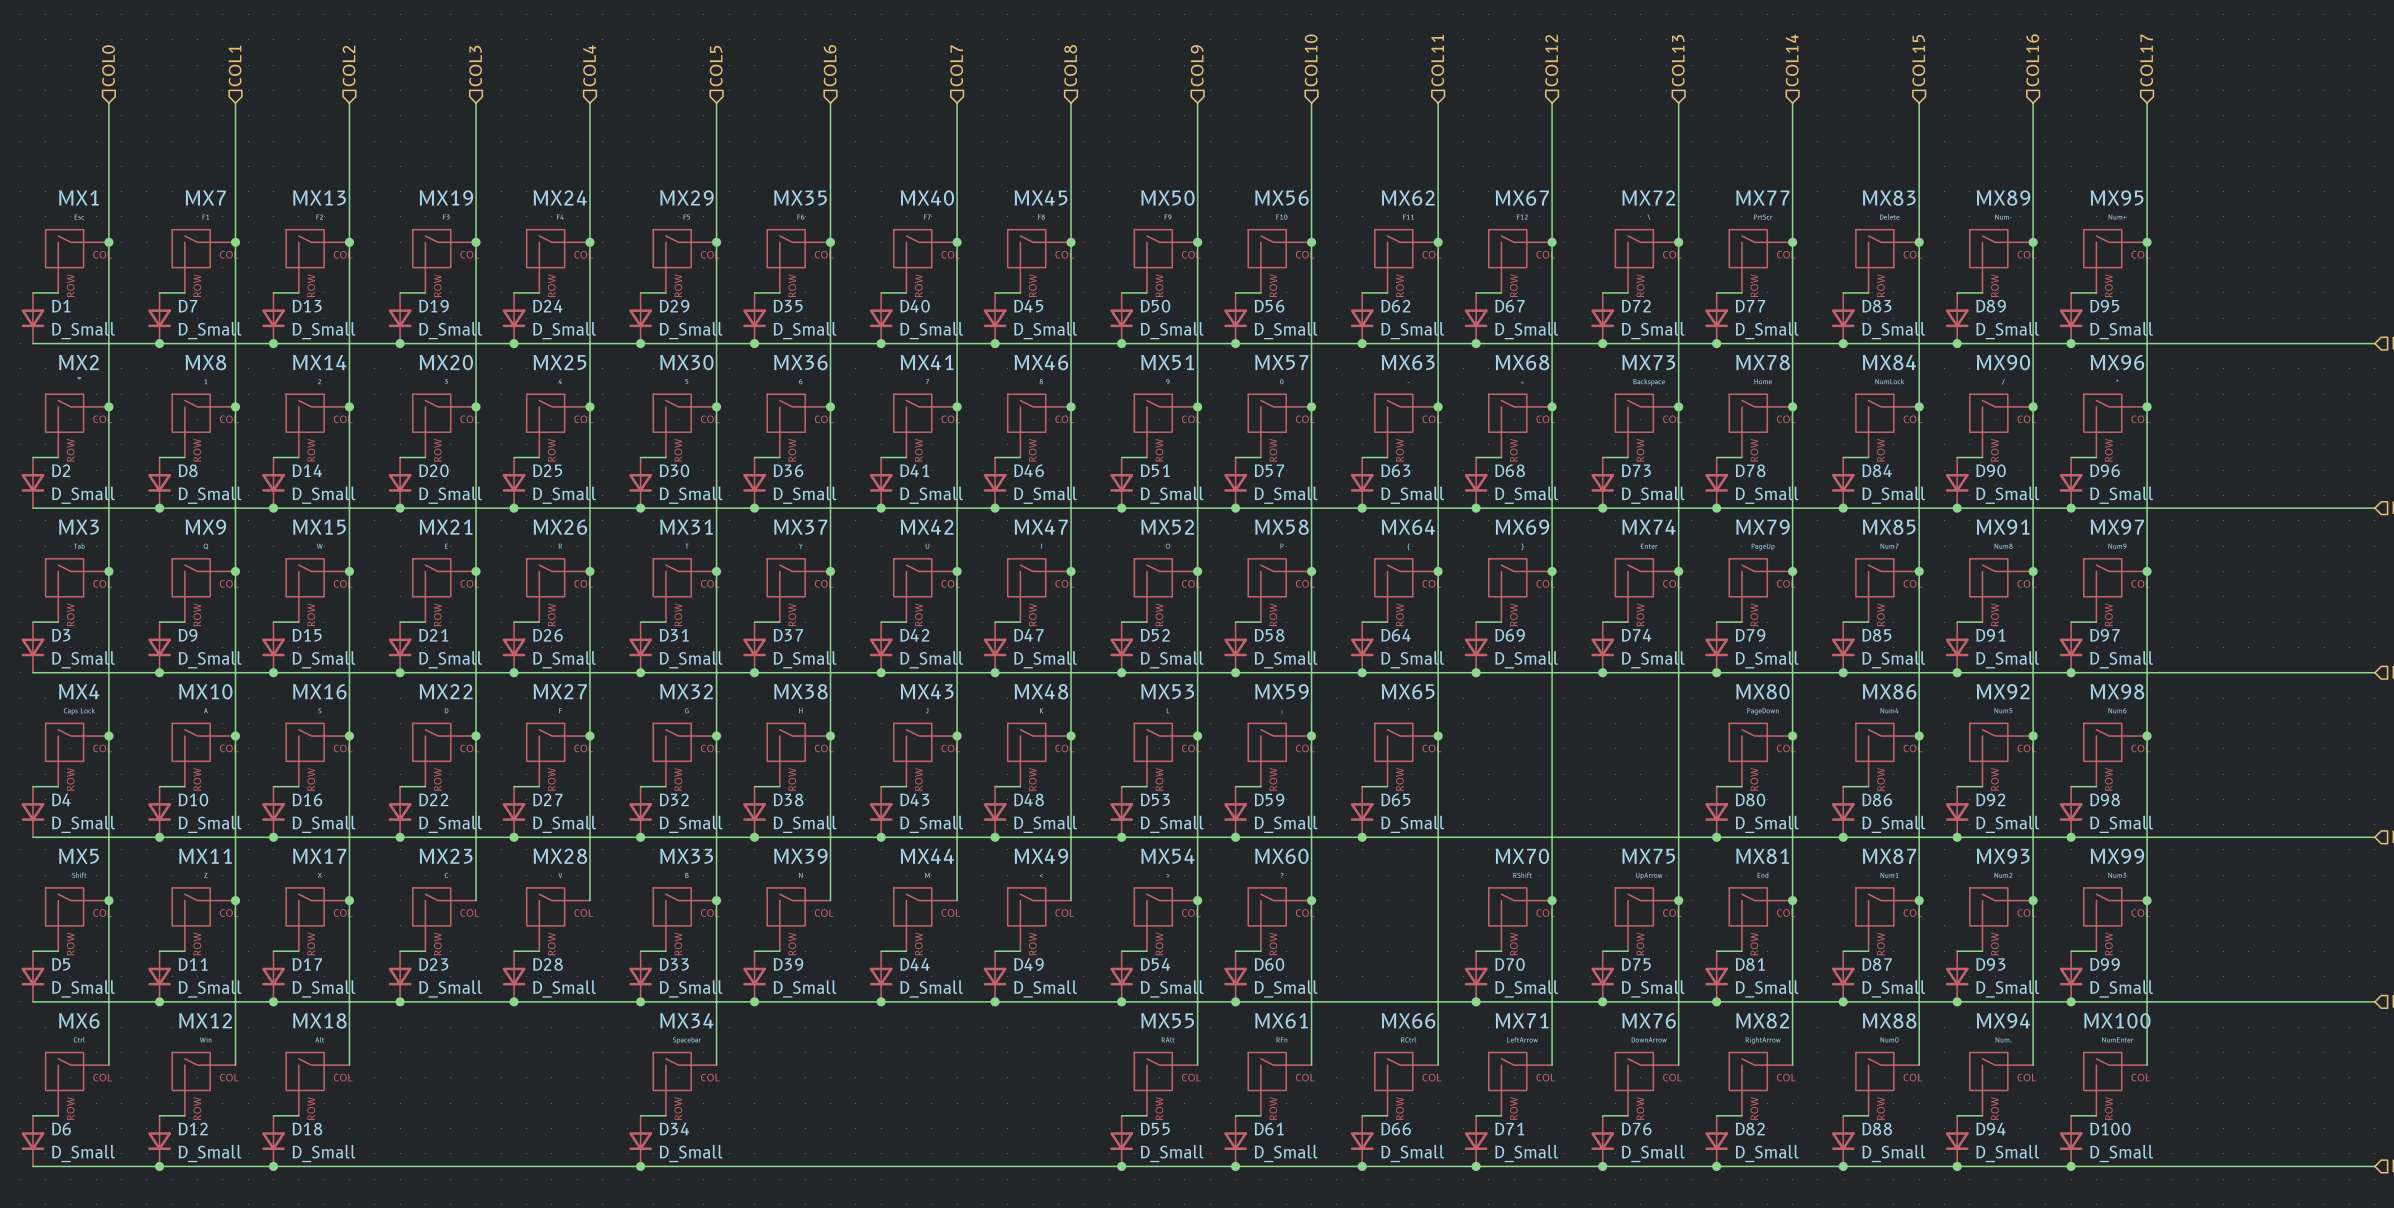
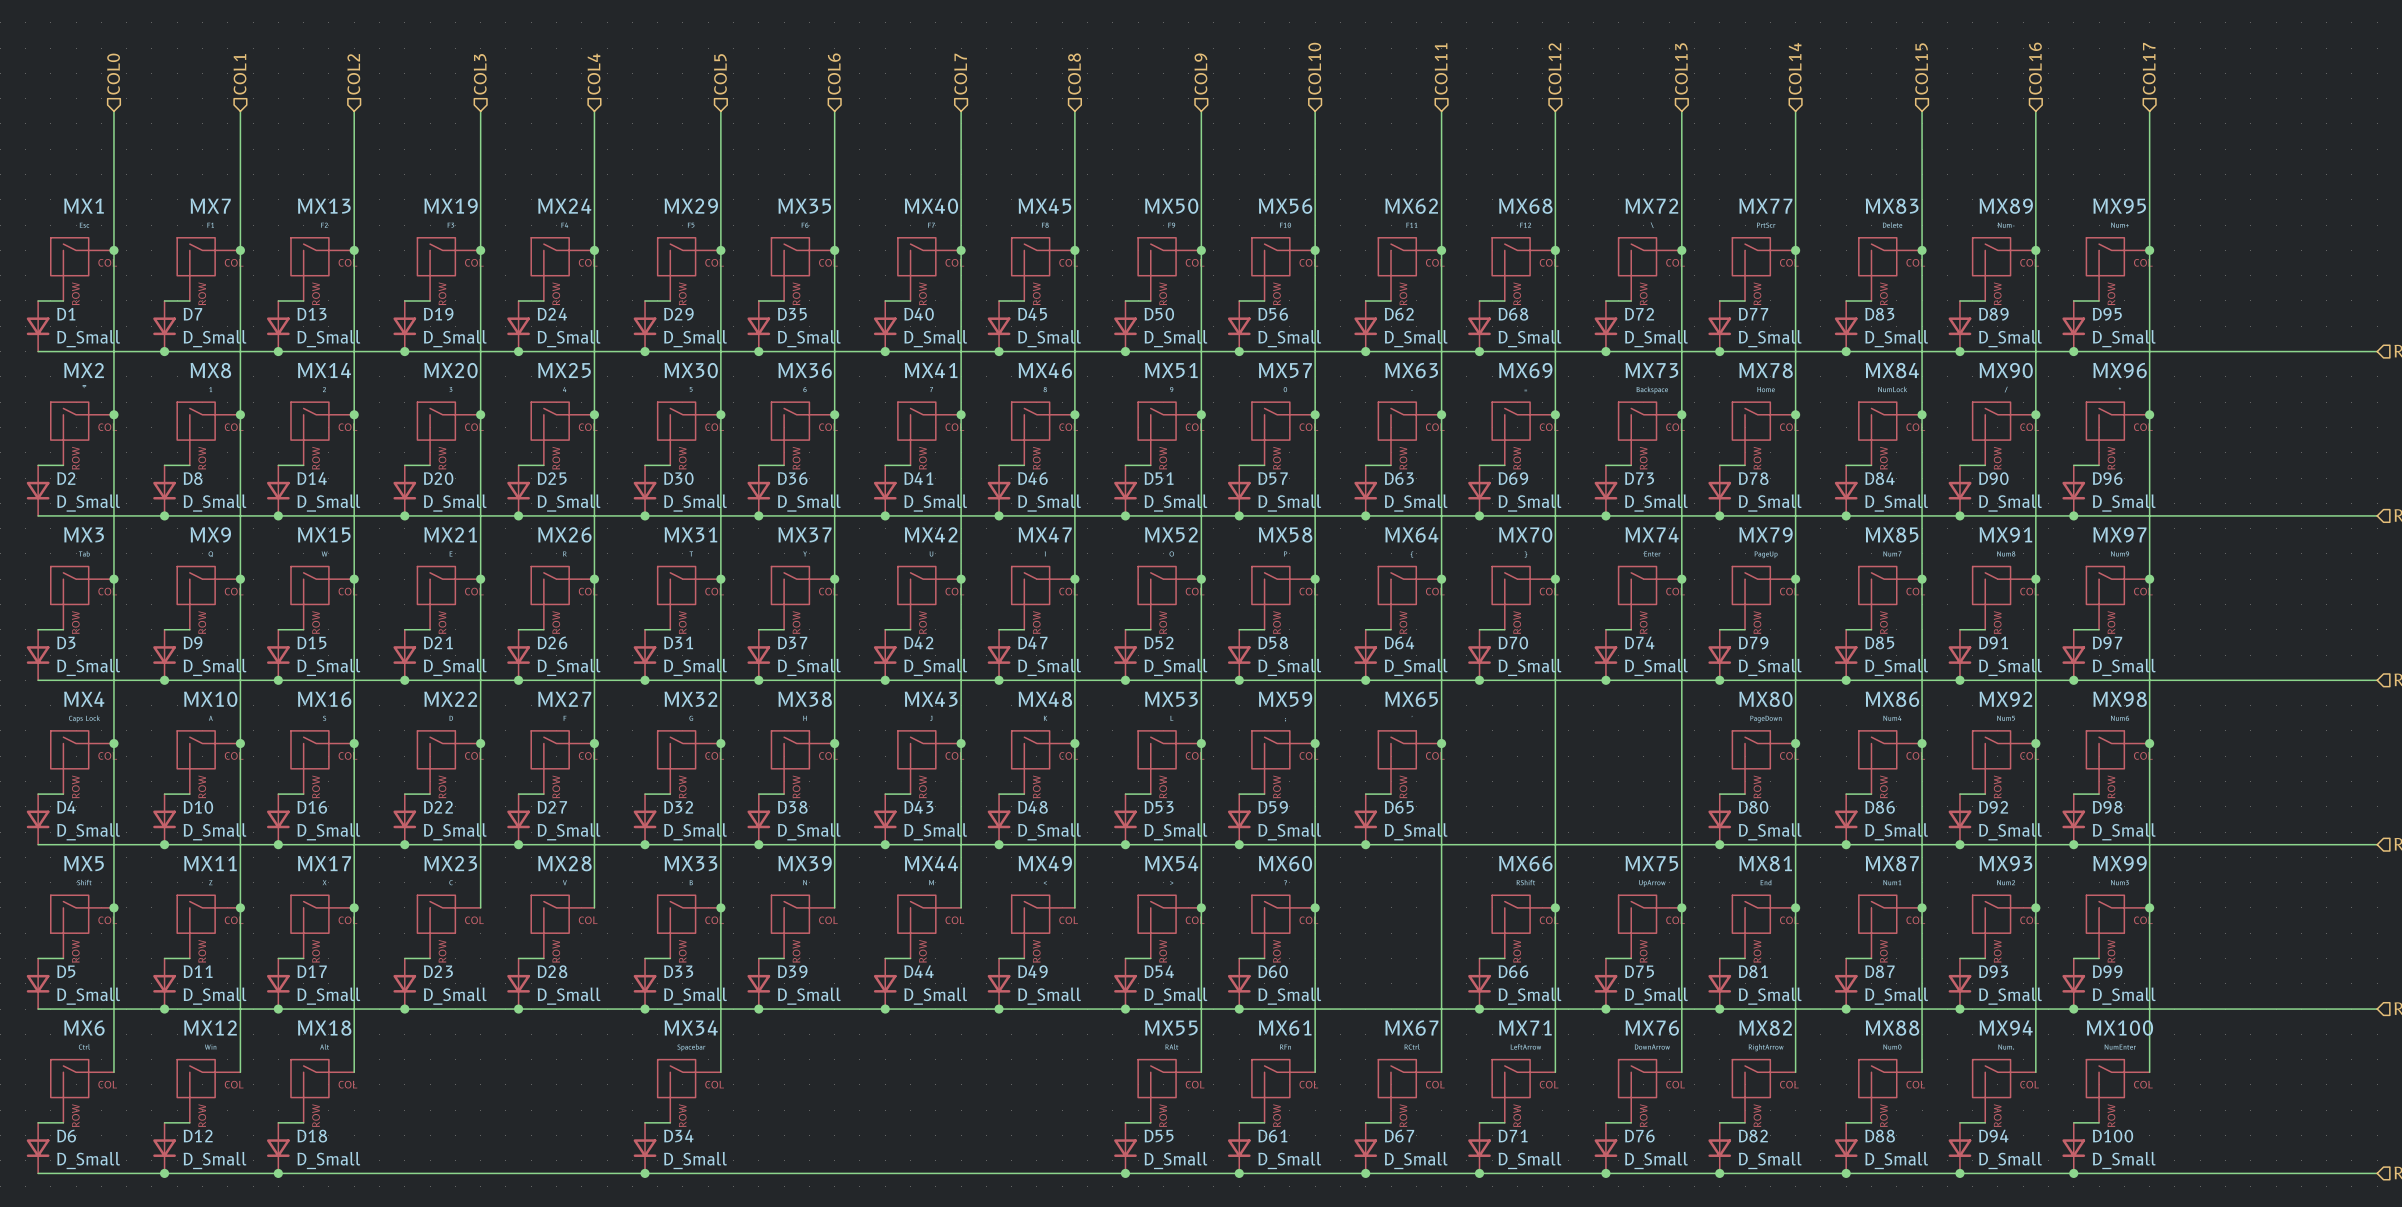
MX67 name: MX67 (1522, 198) -> MX68 (1525, 206)
D67 name: D67 (1509, 306) -> D68 (1513, 314)
MX68 name: MX68 (1522, 362) -> MX69 (1525, 370)
D68 name: D68 (1510, 470) -> D69 (1513, 478)
MX69 name: MX69 (1522, 527) -> MX70 (1525, 534)
D69 name: D69 (1510, 635) -> D70 (1513, 643)
MX70 name: MX70 (1522, 856) -> MX66 (1525, 863)
D70 name: D70 (1510, 964) -> D66 (1513, 971)
MX66 name: MX66 (1408, 1020) -> MX67 (1411, 1028)
D66 name: D66 (1396, 1129) -> D67 (1399, 1136)

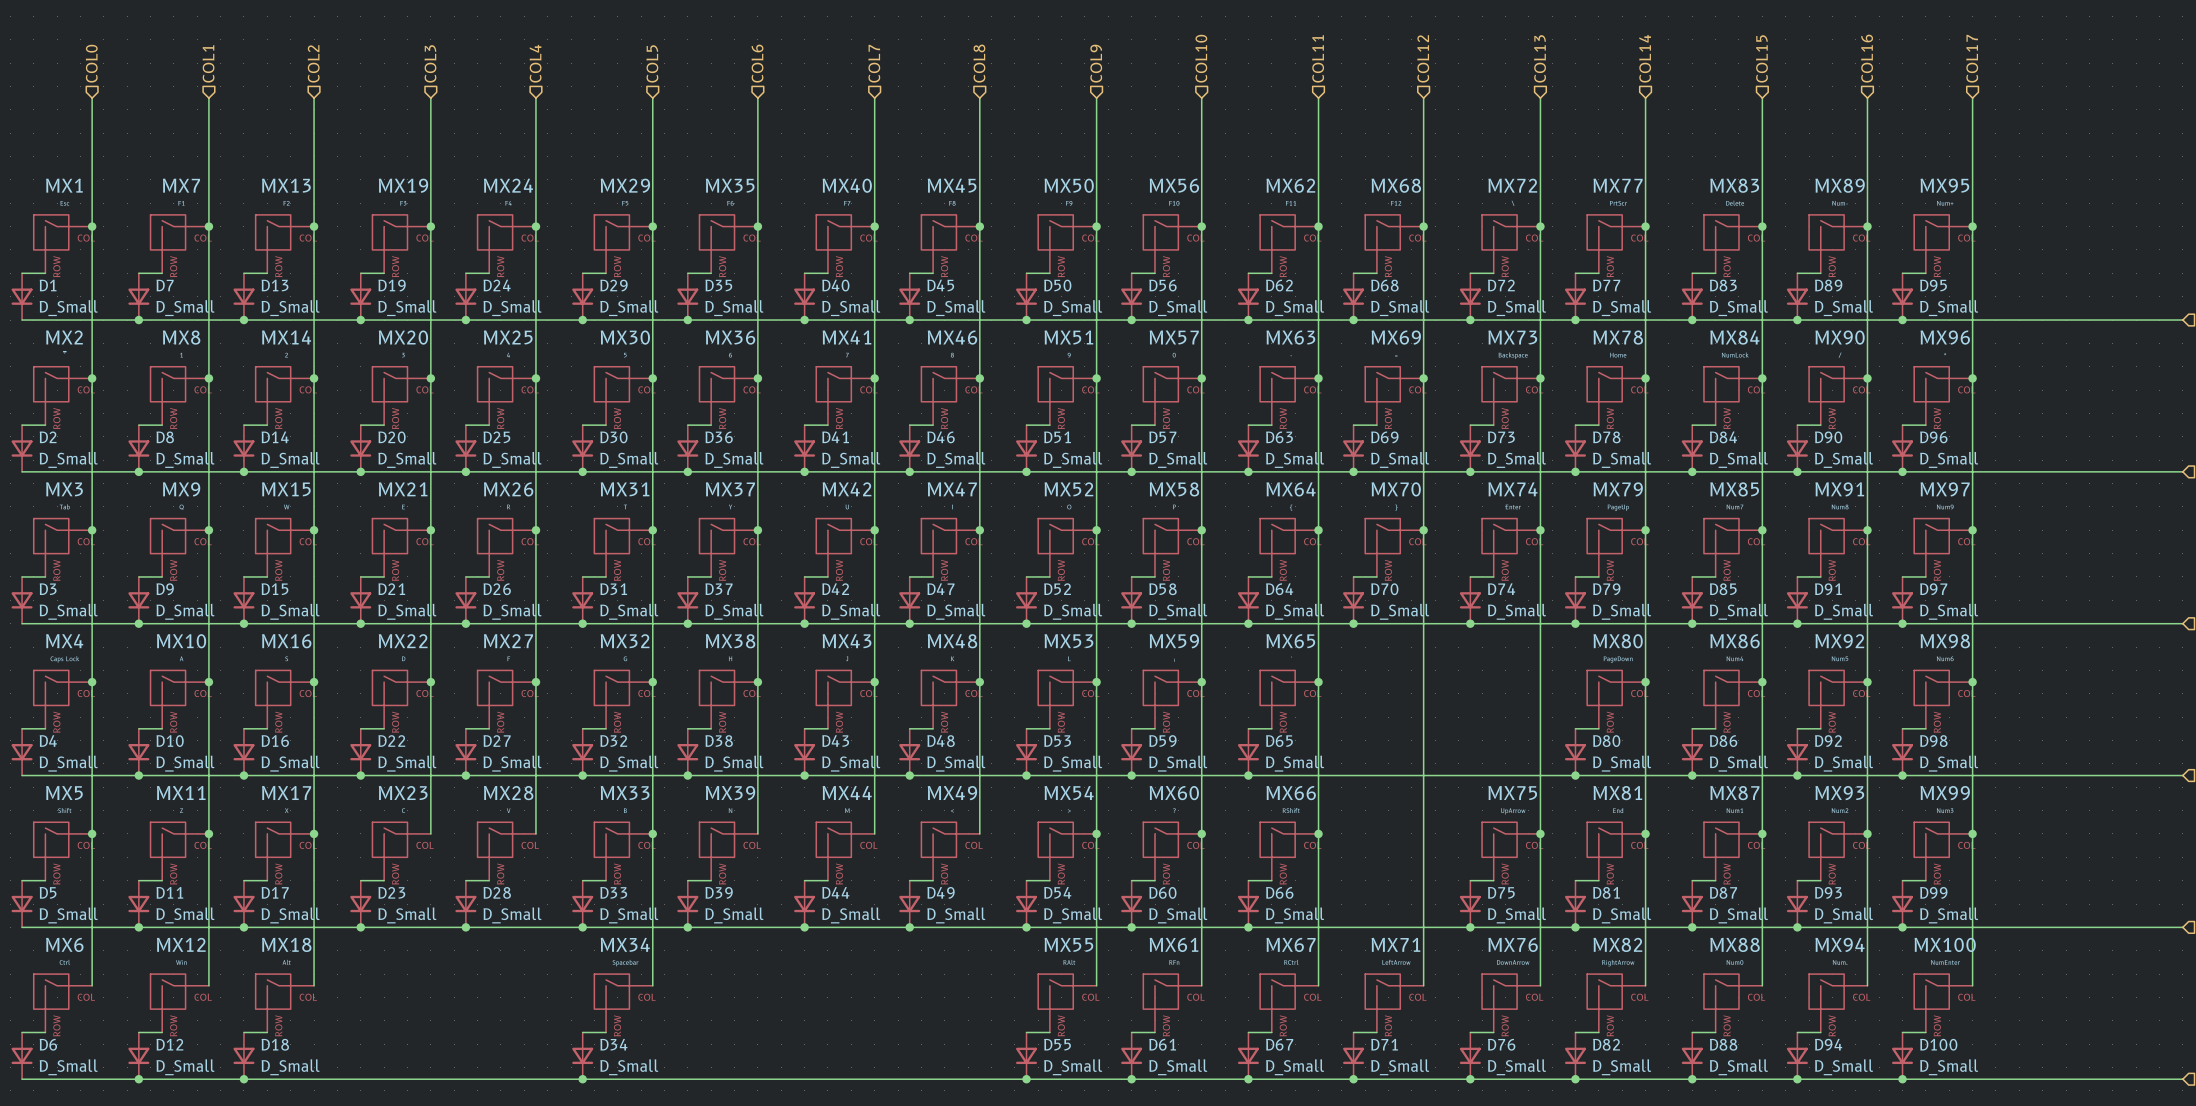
junction: none -> (1318, 833)
junction: (1555, 907) -> none
MX66 position: (1523, 926) -> (1289, 851)
wire: (1479, 958) (1504, 958) -> (1248, 880) (1271, 880)
D66 position: (1479, 983) -> (1248, 904)
junction: none -> (1248, 927)
junction: (1479, 1009) -> none

